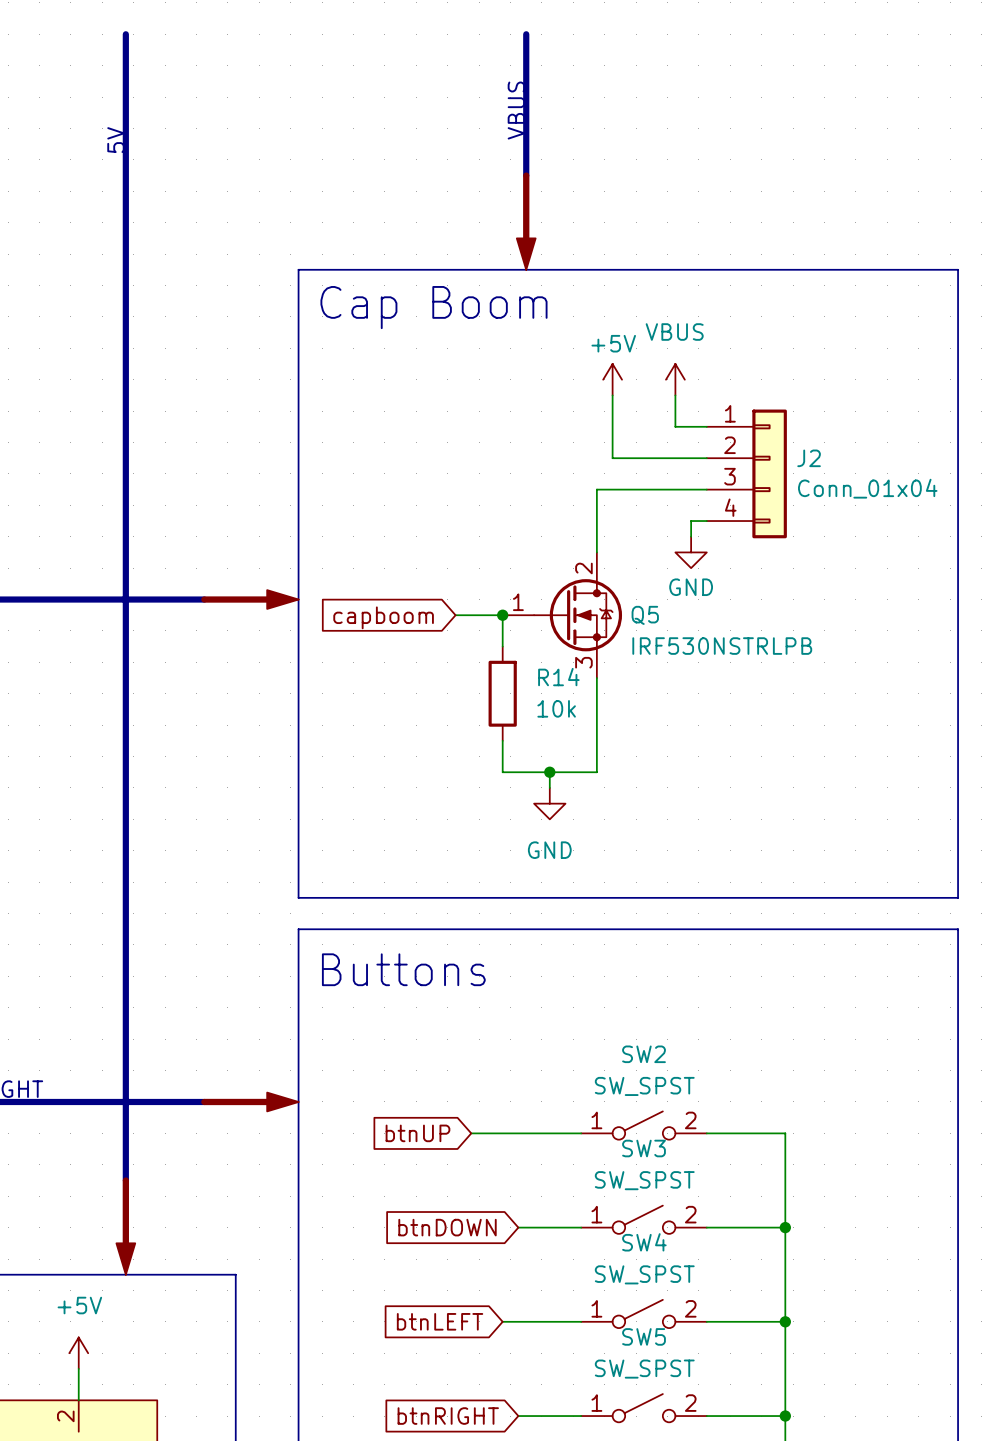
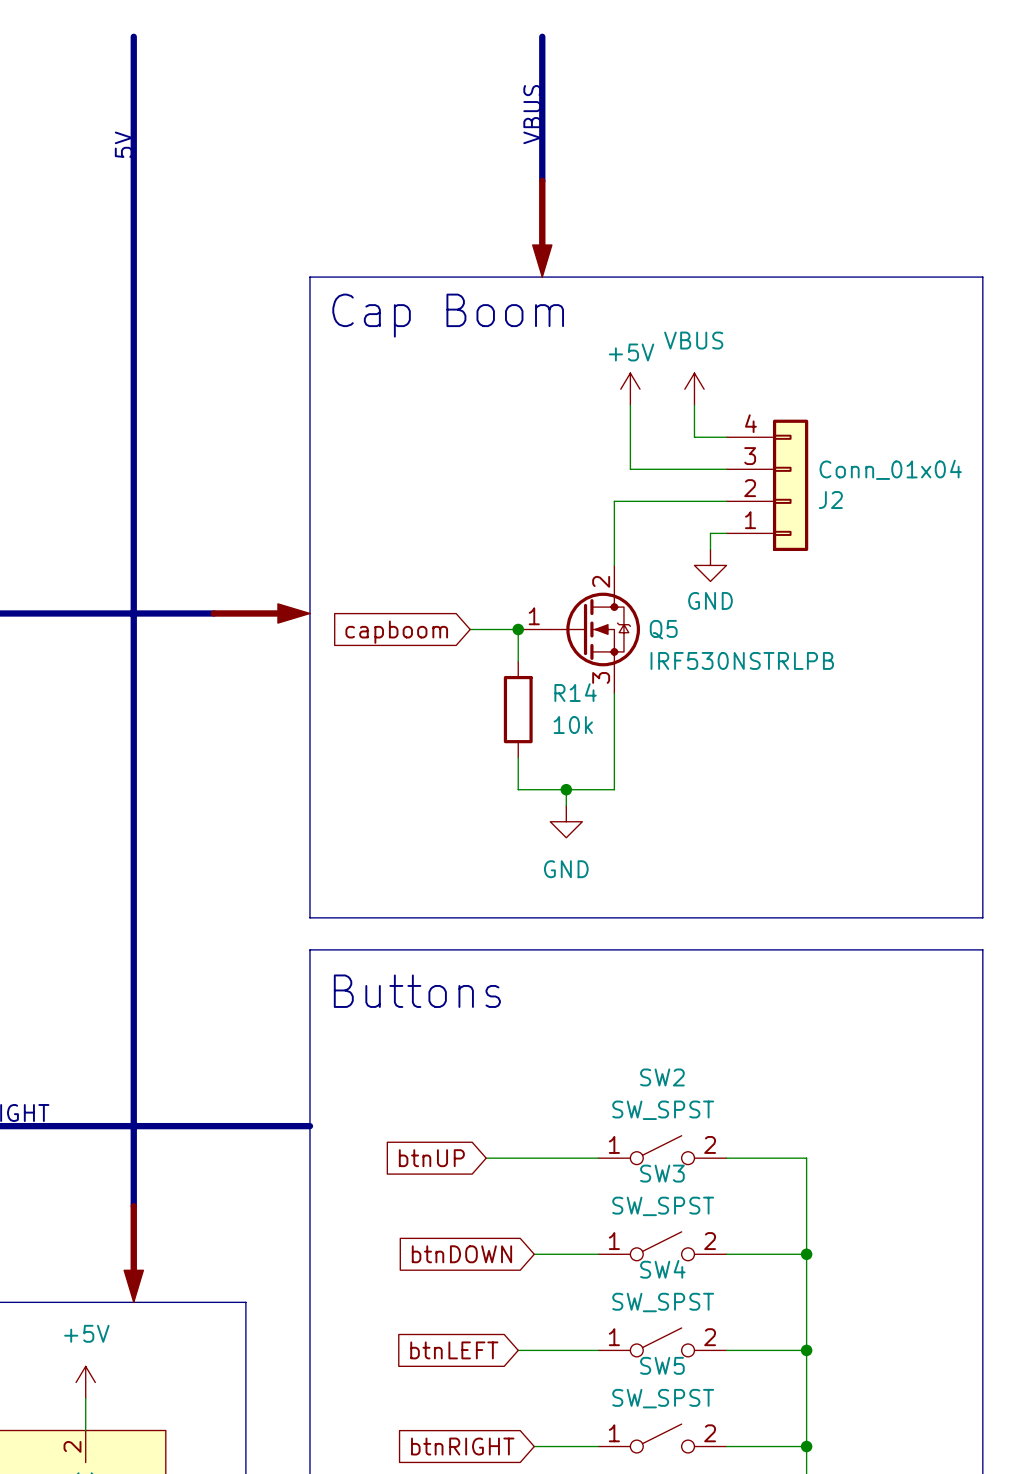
J2 flip: as is (769, 473) -> up-down (790, 485)
line: none -> (213, 1126) (309, 1126)
power symbol: (249, 1101) -> none

